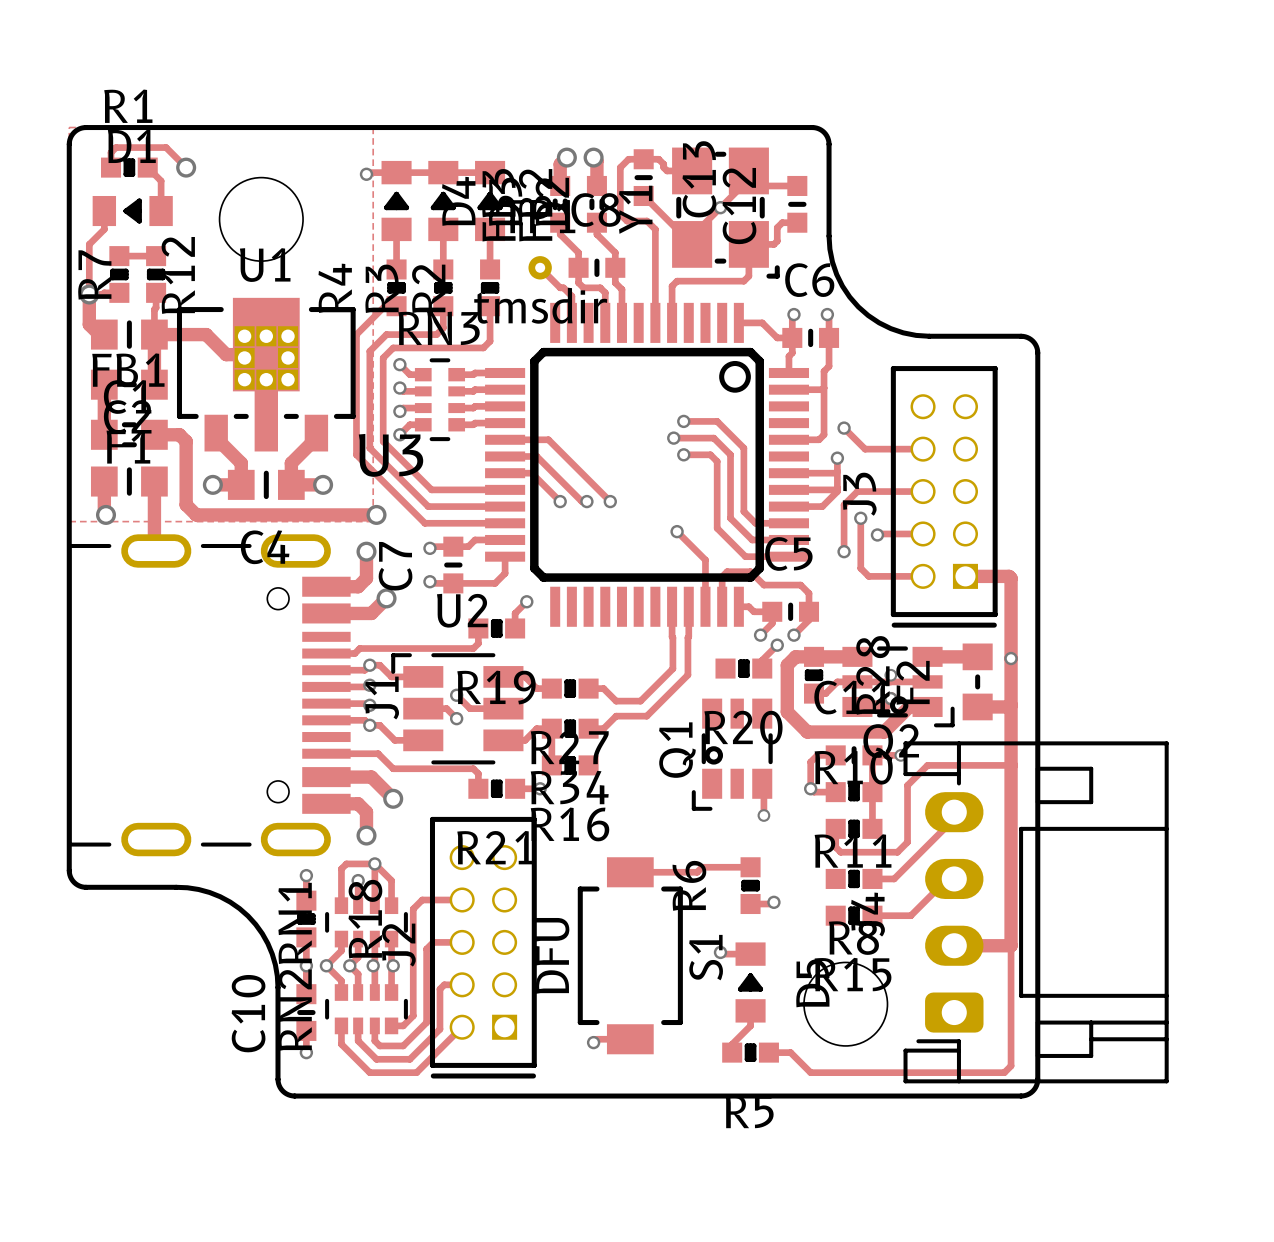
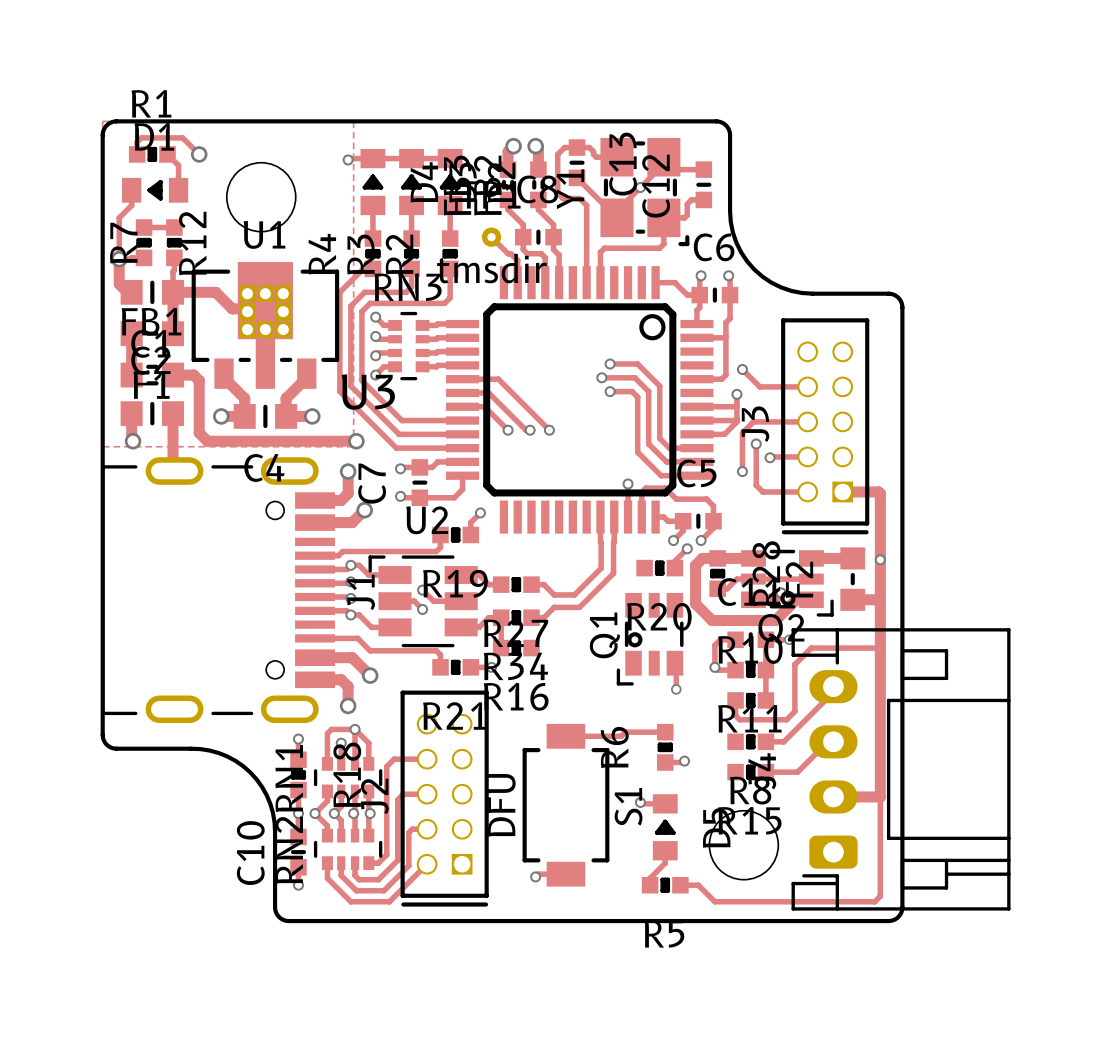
track: (677, 531) (705, 560) (705, 566) -> none
via position: (677, 531) -> (628, 483)
via: (890, 675) -> none

